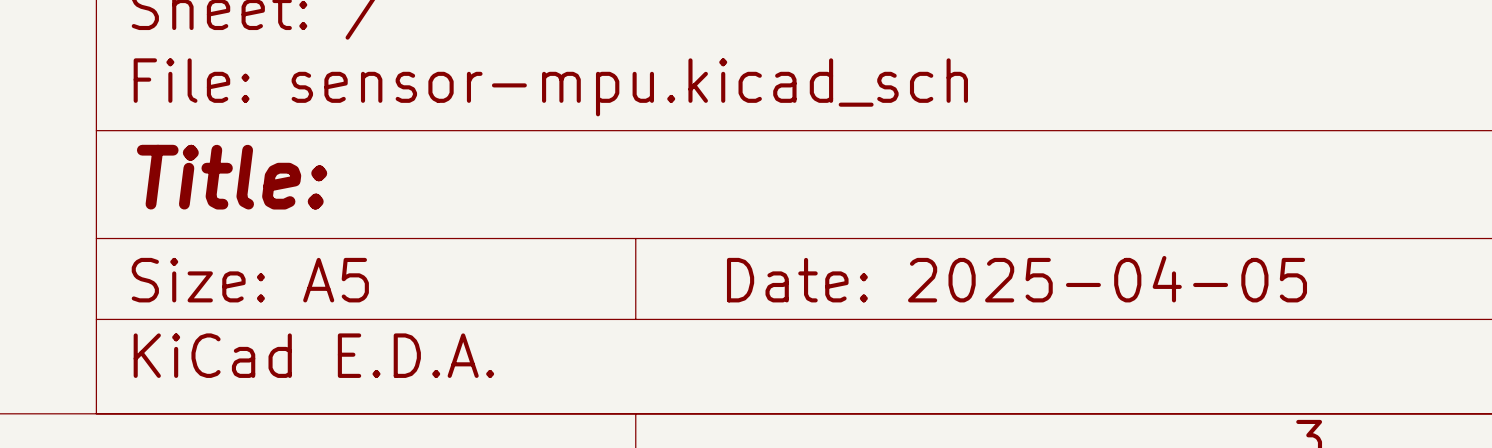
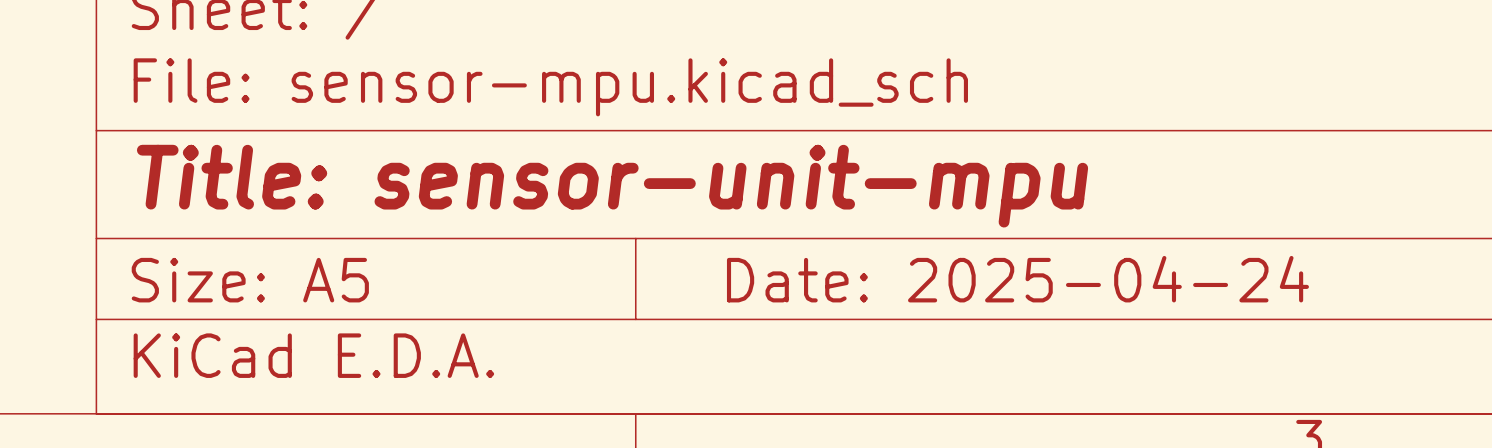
title block: Title: (232, 177) -> Title: sensor-unit-mpu (612, 186)
title block: Date: 2025-04-05 (1016, 279) -> Date: 2025-04-24 (1017, 279)

